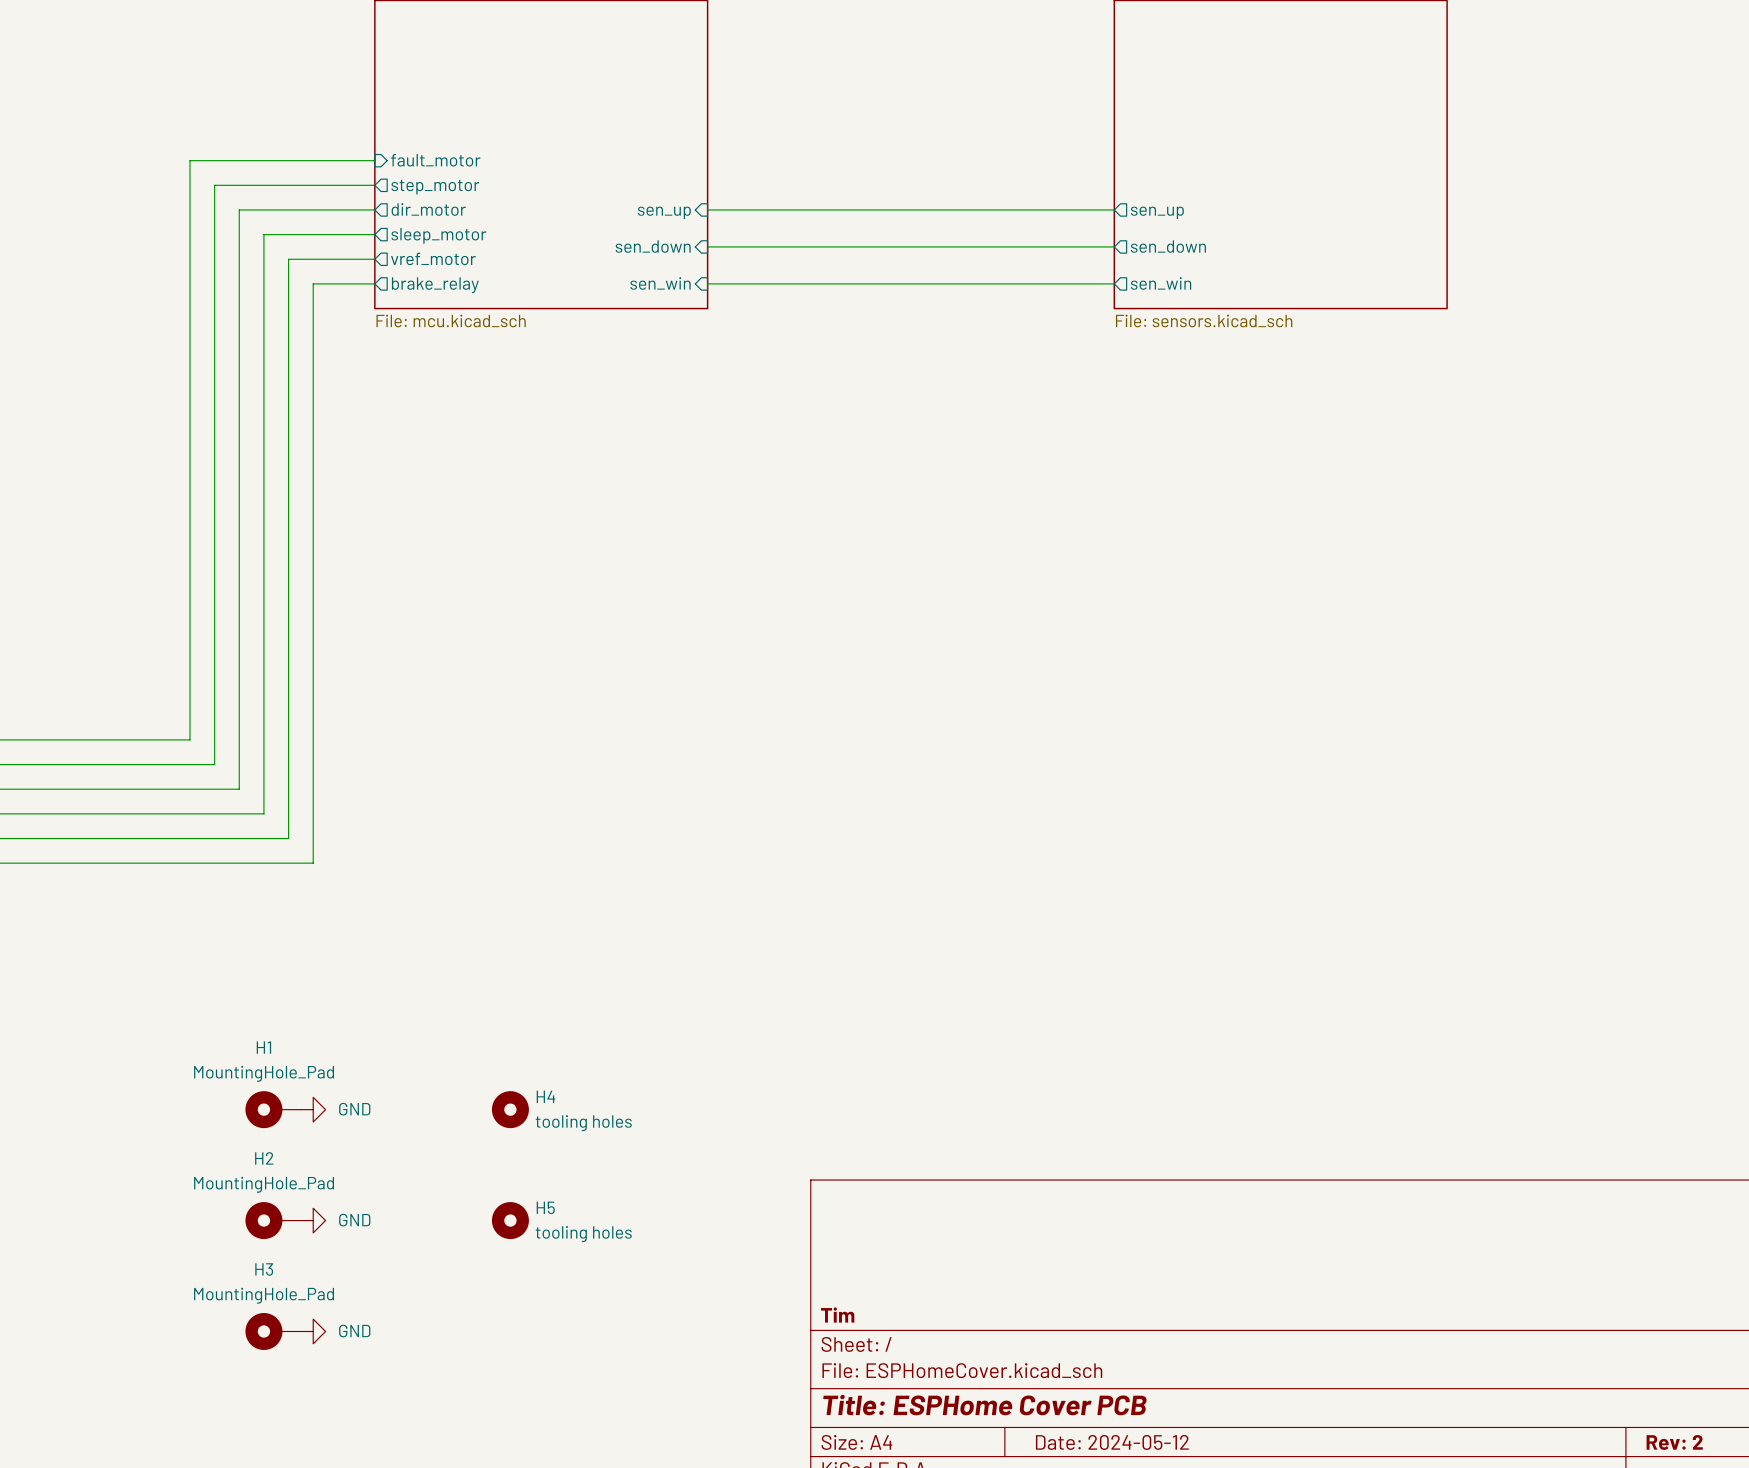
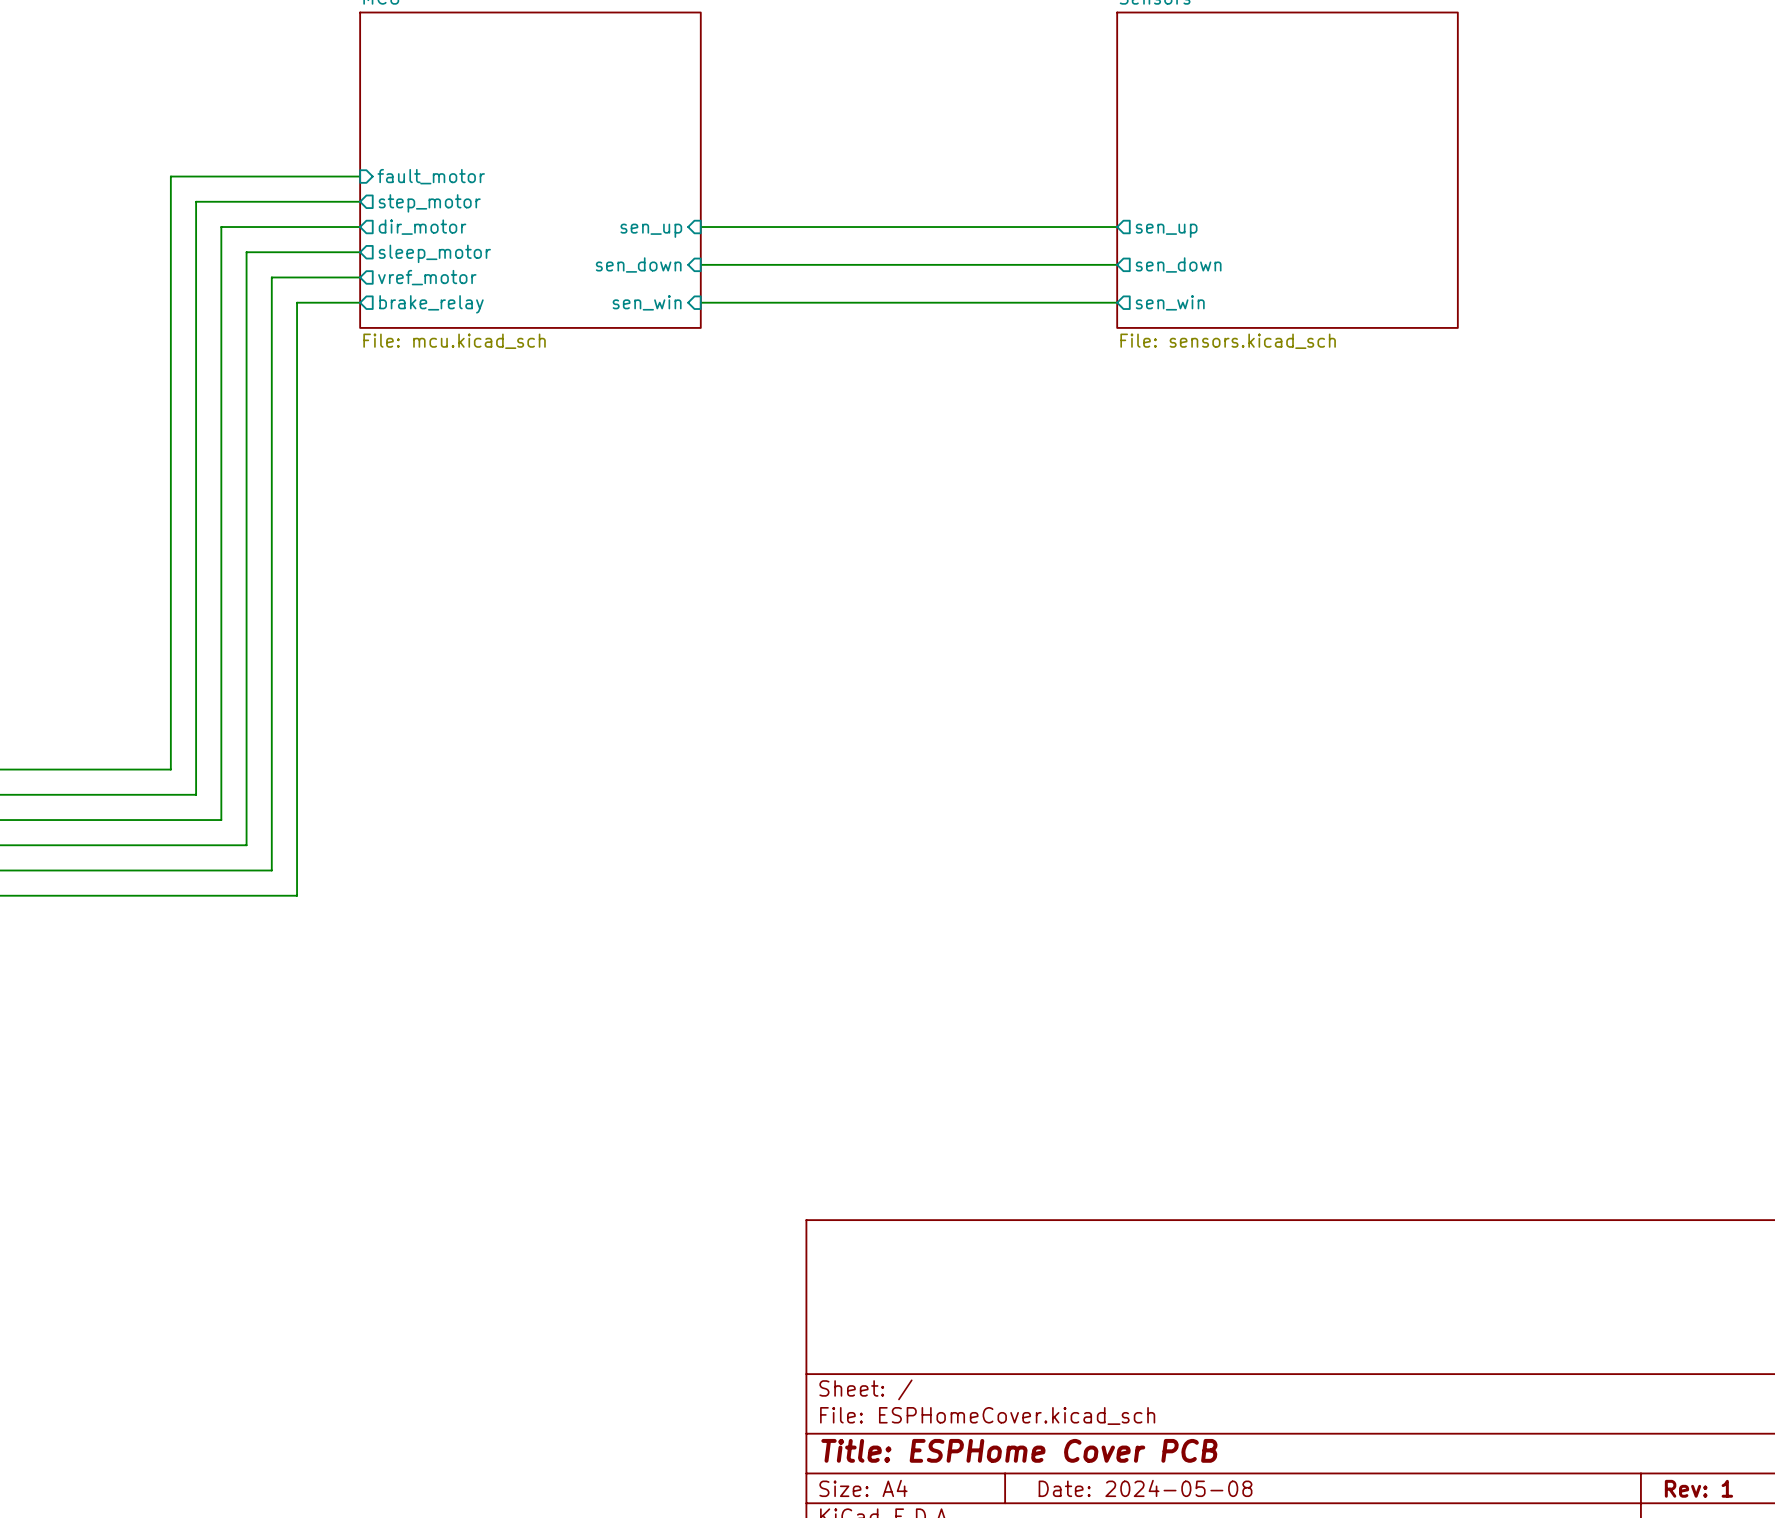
H1: MountingHole_Pad (273, 1109) -> none
power symbol: GND (313, 1109) -> none
H4: tooling holes (510, 1109) -> none
H2: MountingHole_Pad (273, 1220) -> none
power symbol: GND (313, 1220) -> none
H5: tooling holes (510, 1220) -> none
title block: Tim (837, 1315) -> none
H3: MountingHole_Pad (273, 1331) -> none
power symbol: GND (313, 1331) -> none
title block: Date: 2024-05-12 (1112, 1442) -> Date: 2024-05-08 (1145, 1488)
title block: Rev: 2 (1674, 1442) -> Rev: 1 (1698, 1488)

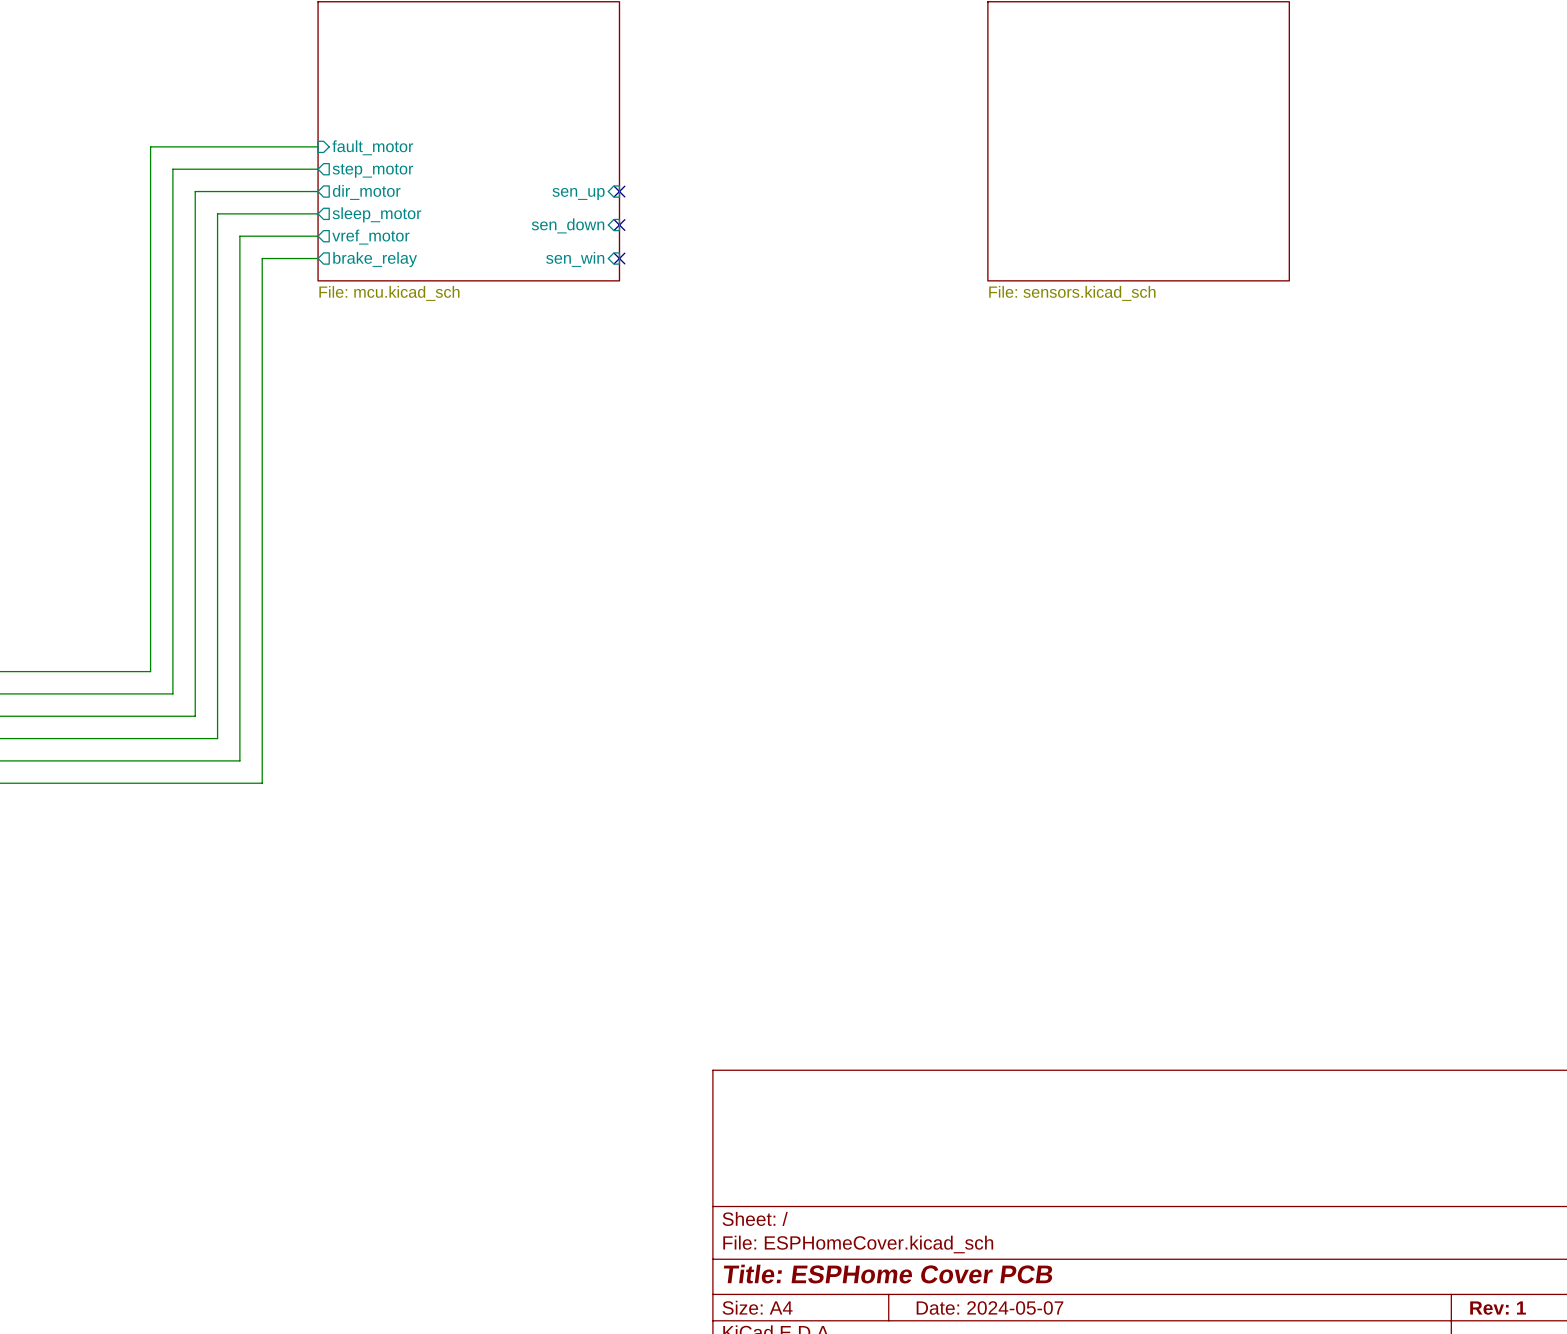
wire: (700, 227) (1117, 227) -> none
no-connect mark: none -> (619, 191)
sheet pin: sen_up (1166, 230) -> none
wire: (700, 264) (1117, 264) -> none
no-connect mark: none -> (619, 225)
sheet pin: sen_down (1178, 264) -> none
wire: (700, 302) (1117, 302) -> none
no-connect mark: none -> (619, 258)
sheet pin: sen_win (1170, 302) -> none
title block: Date: 2024-05-08 (1145, 1488) -> Date: 2024-05-07 (990, 1307)

